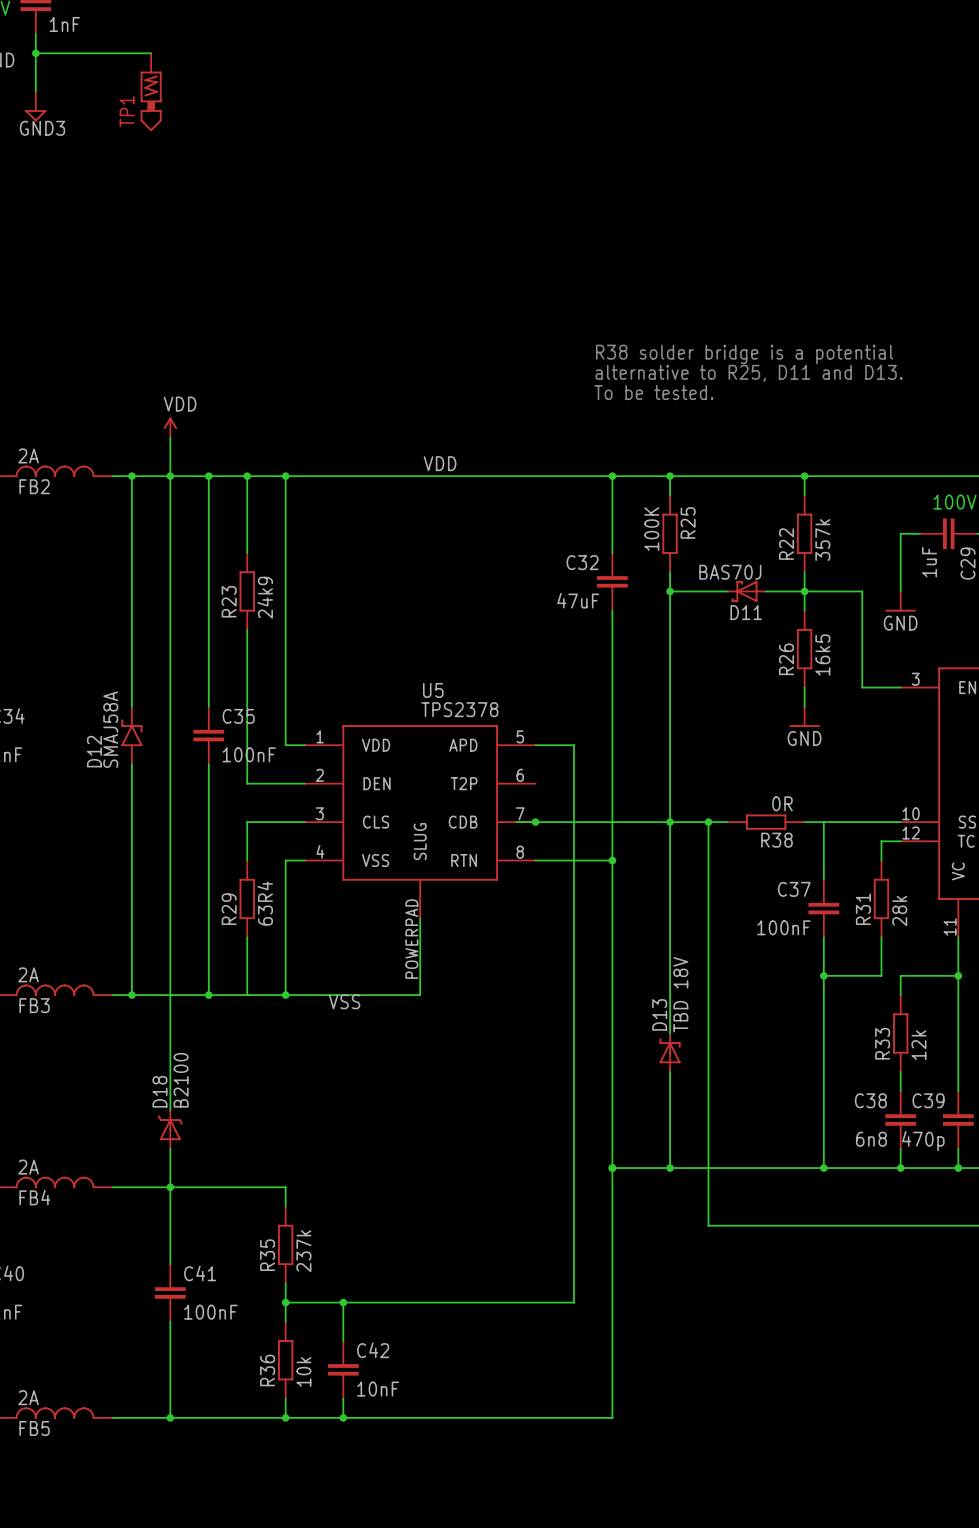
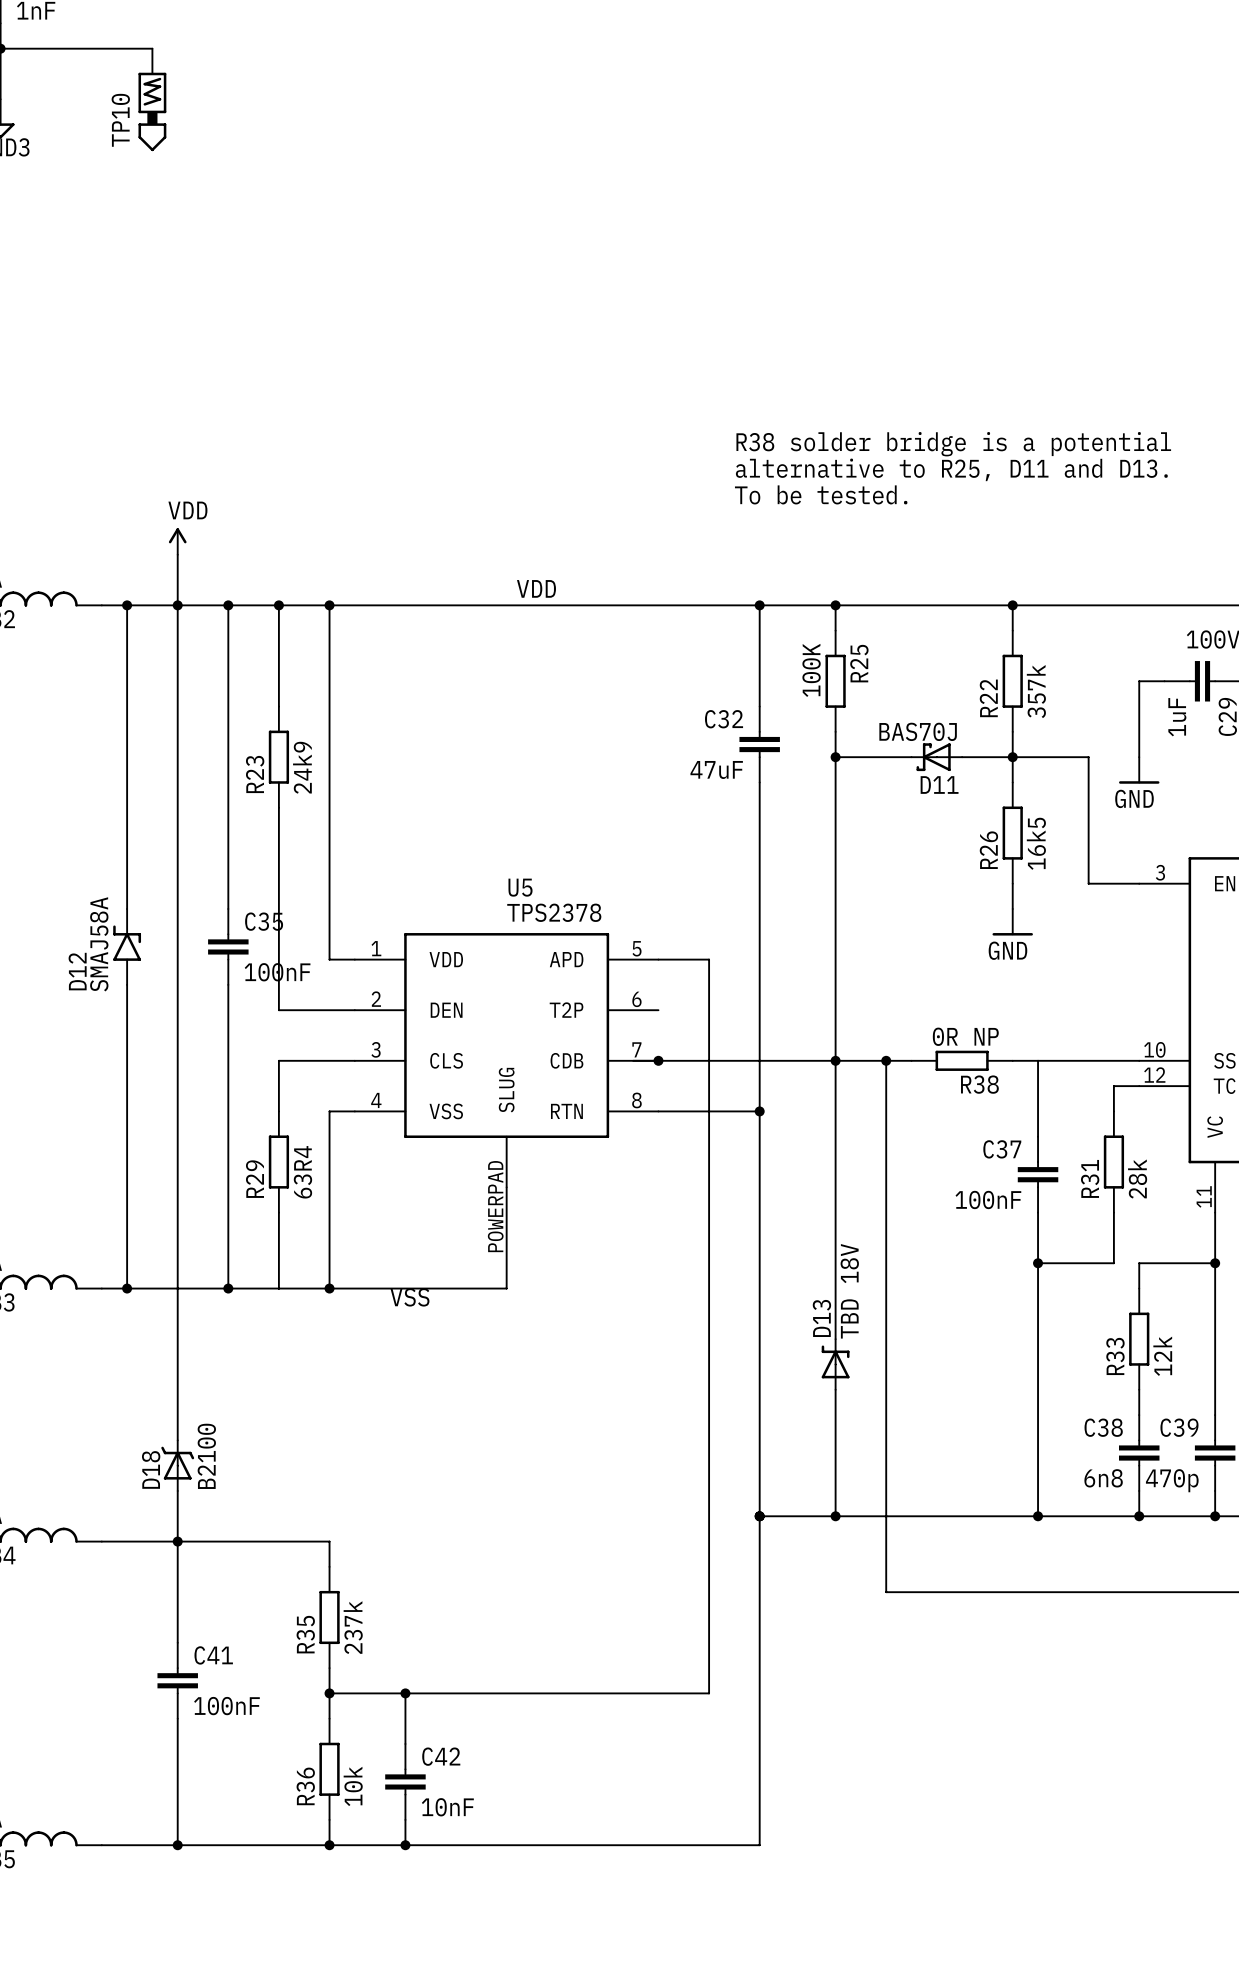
TP1 name: TP1 (127, 111) -> TP10 (120, 120)
R38 value: 0R (782, 803) -> 0R NP (965, 1036)
D18 value position: B2100 (181, 1080) -> B2100 (206, 1456)
D18 name position: D18 (159, 1091) -> D18 (151, 1469)

